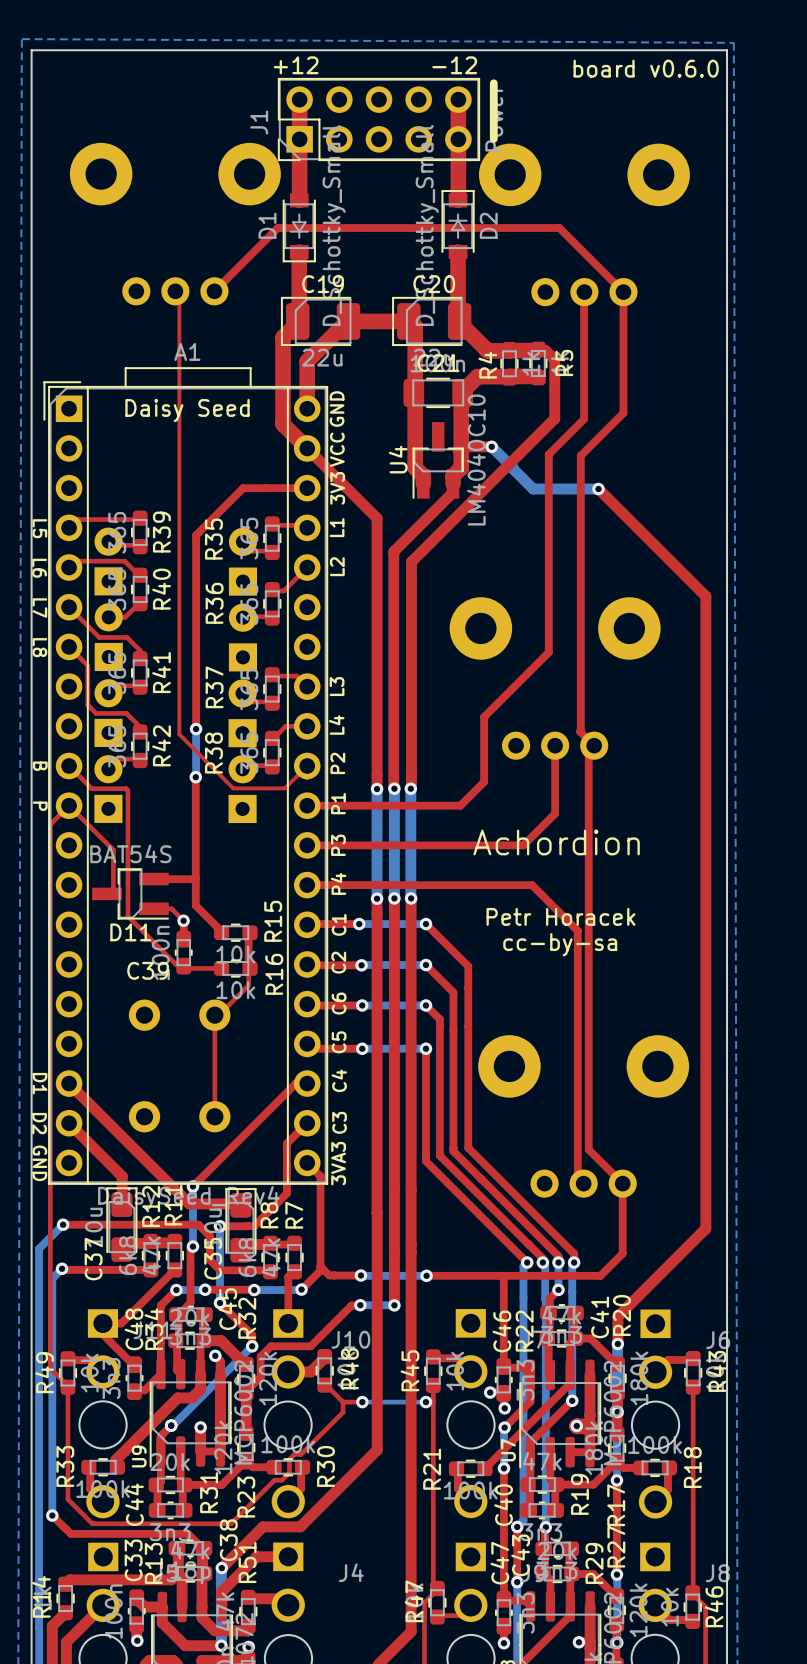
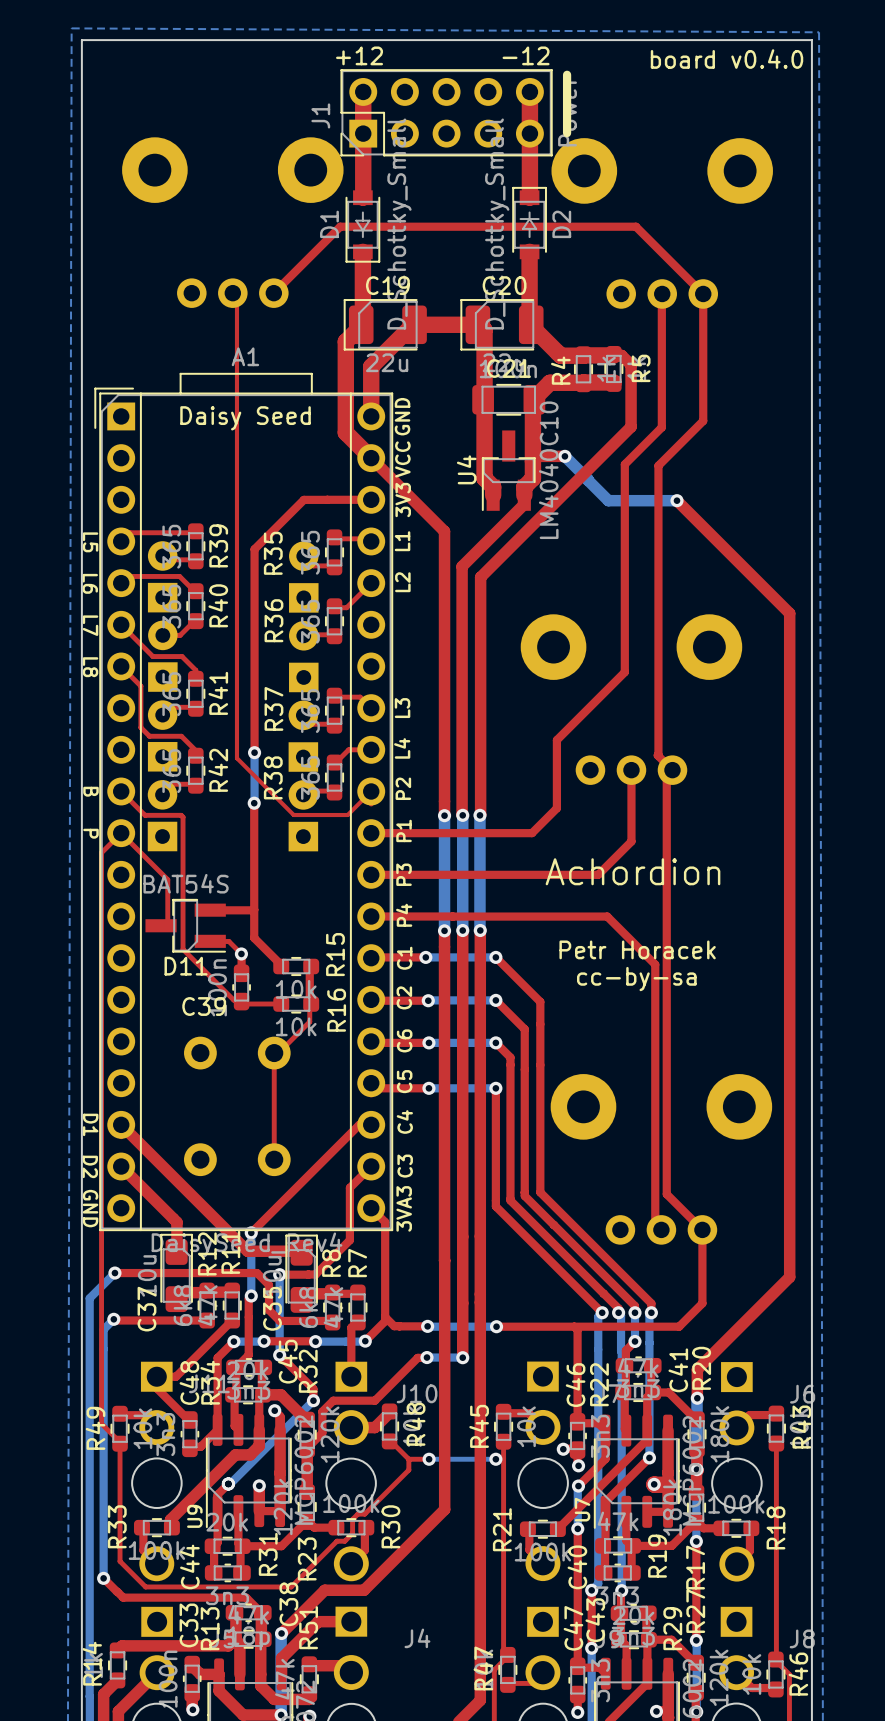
text: board v0.6.0 (646, 68) -> board v0.4.0 (727, 59)

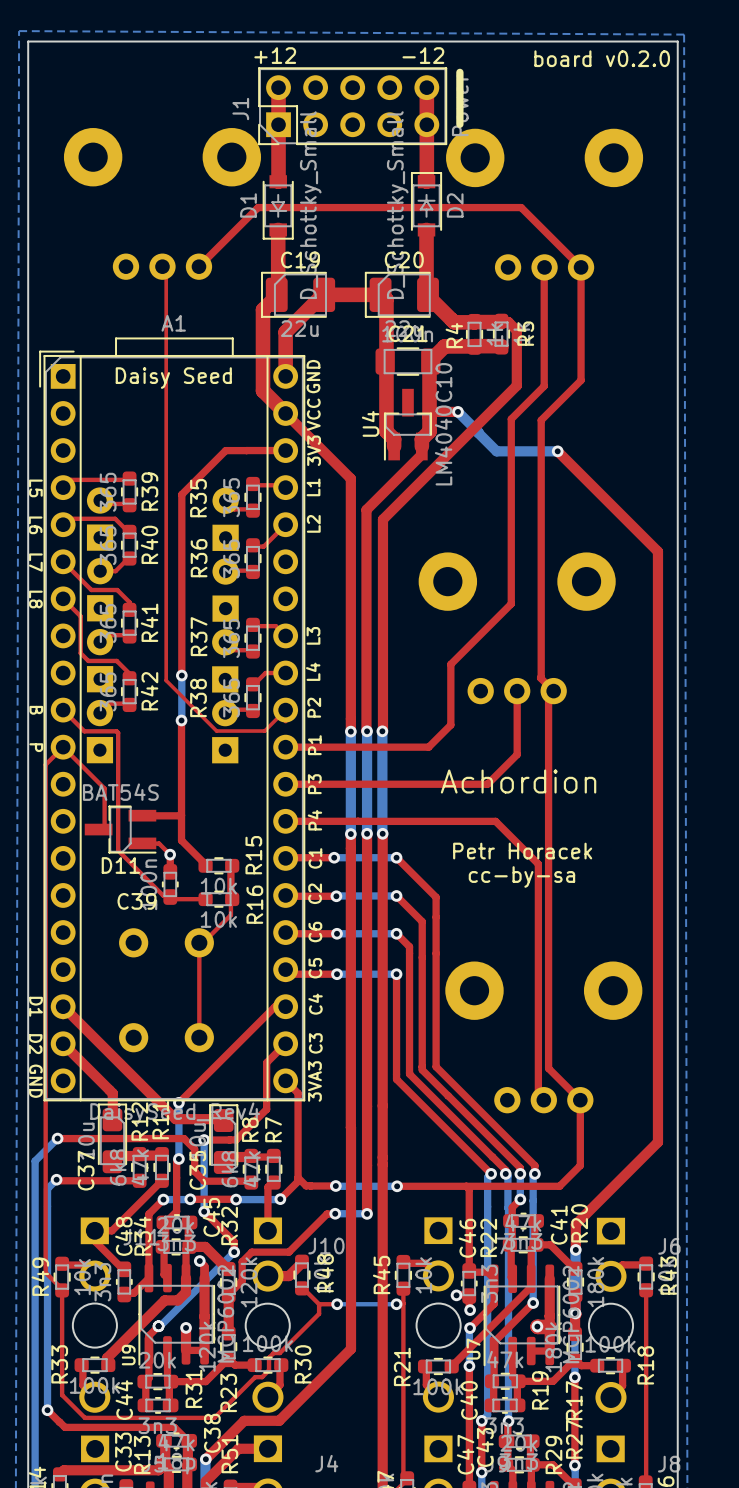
text: board v0.4.0 (727, 59) -> board v0.2.0 (602, 58)

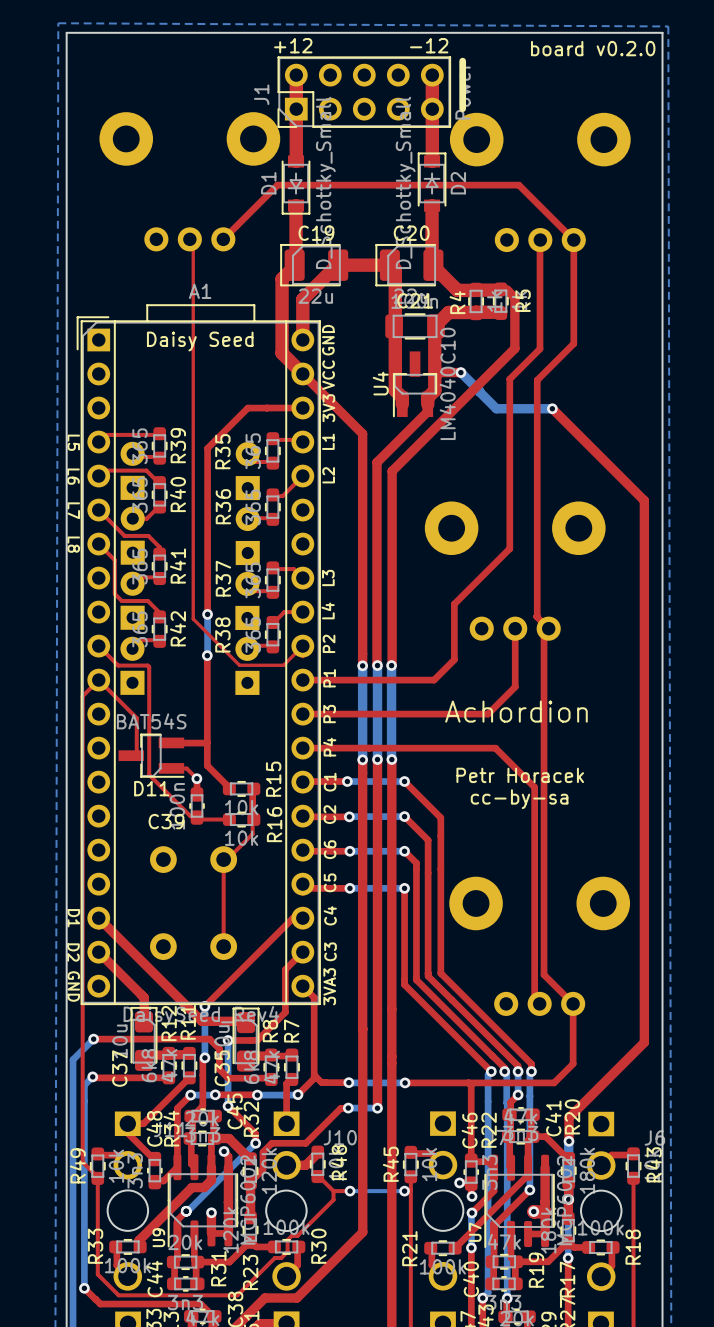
text: B (36, 710) -> none
text: P (36, 747) -> none

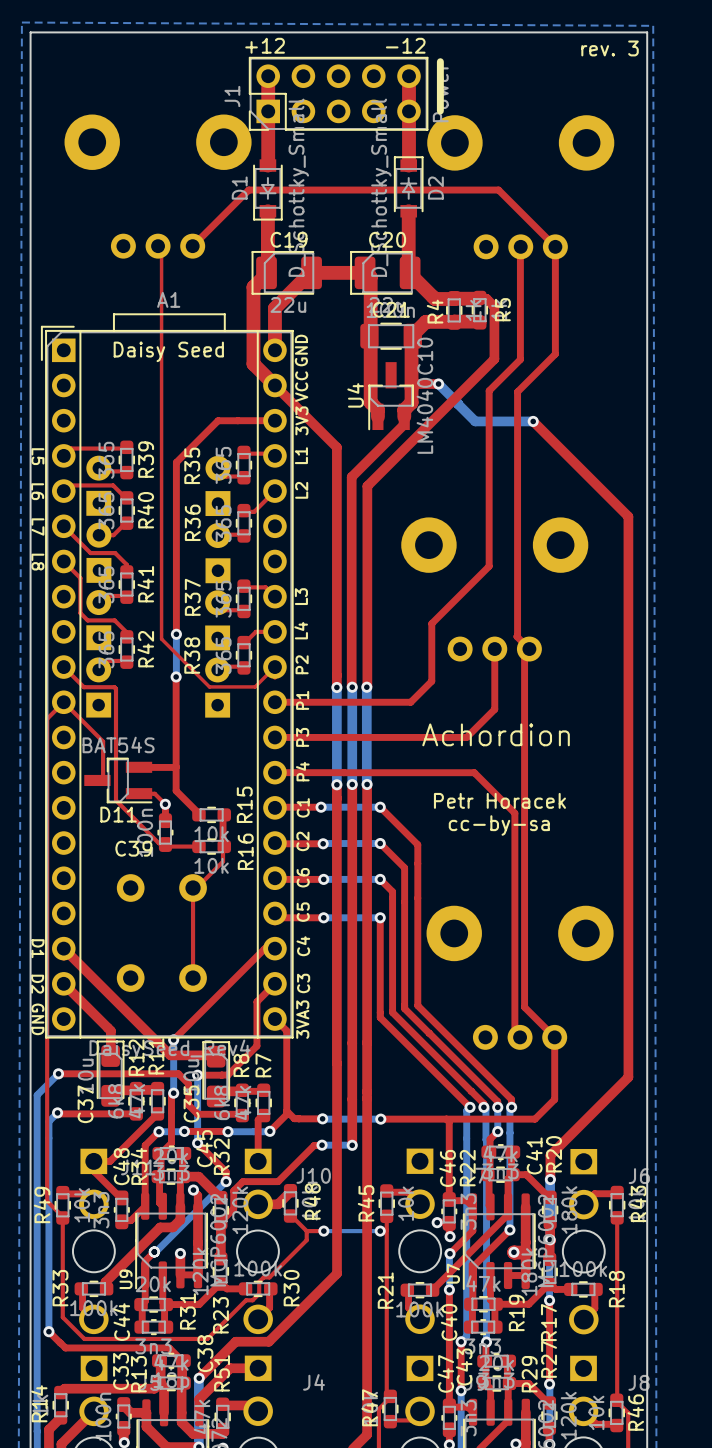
text: board v0.2.0 (593, 48) -> none
text: none -> rev. 3 (610, 48)

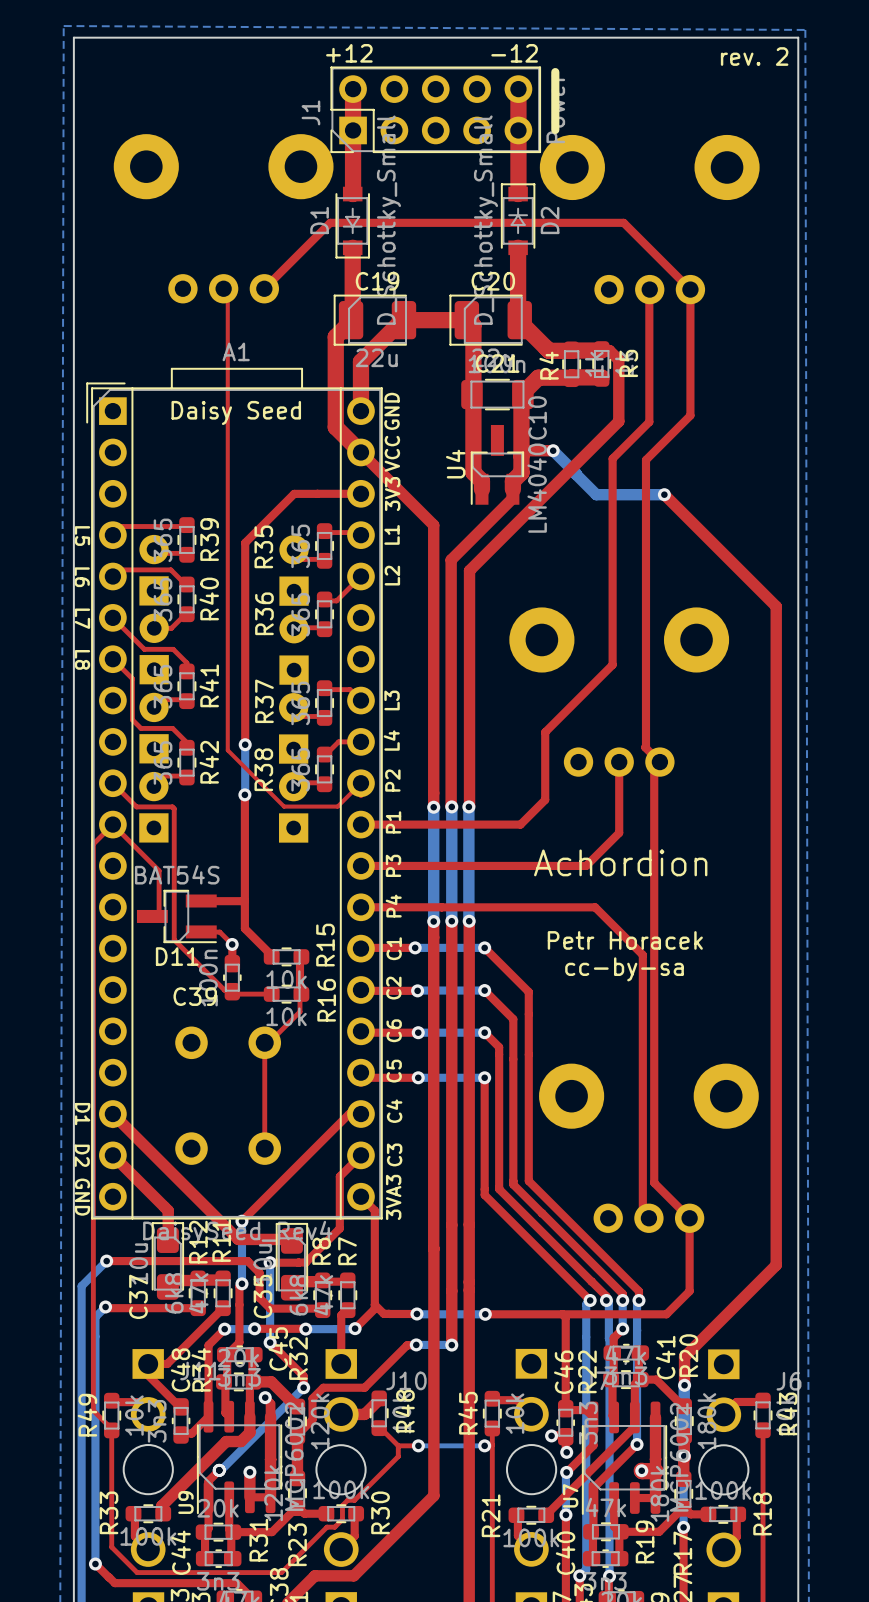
text: rev. 3 (610, 48) -> rev. 2 (754, 56)

